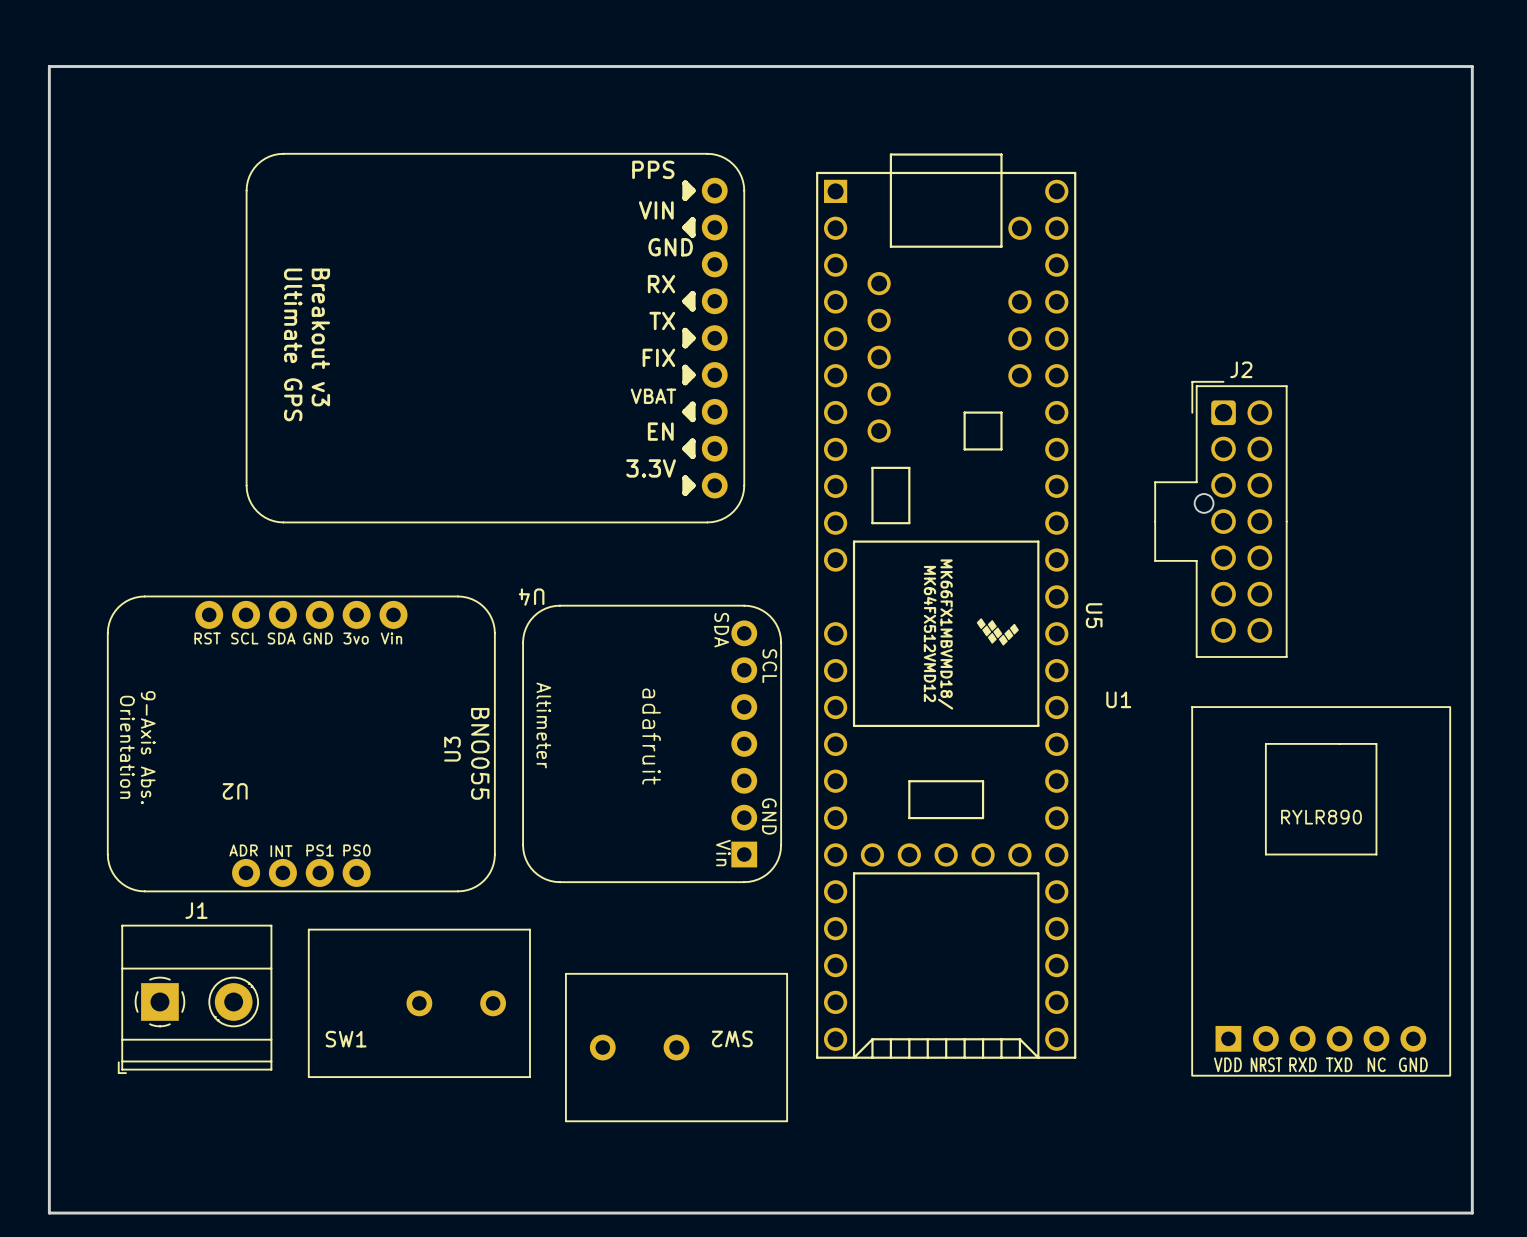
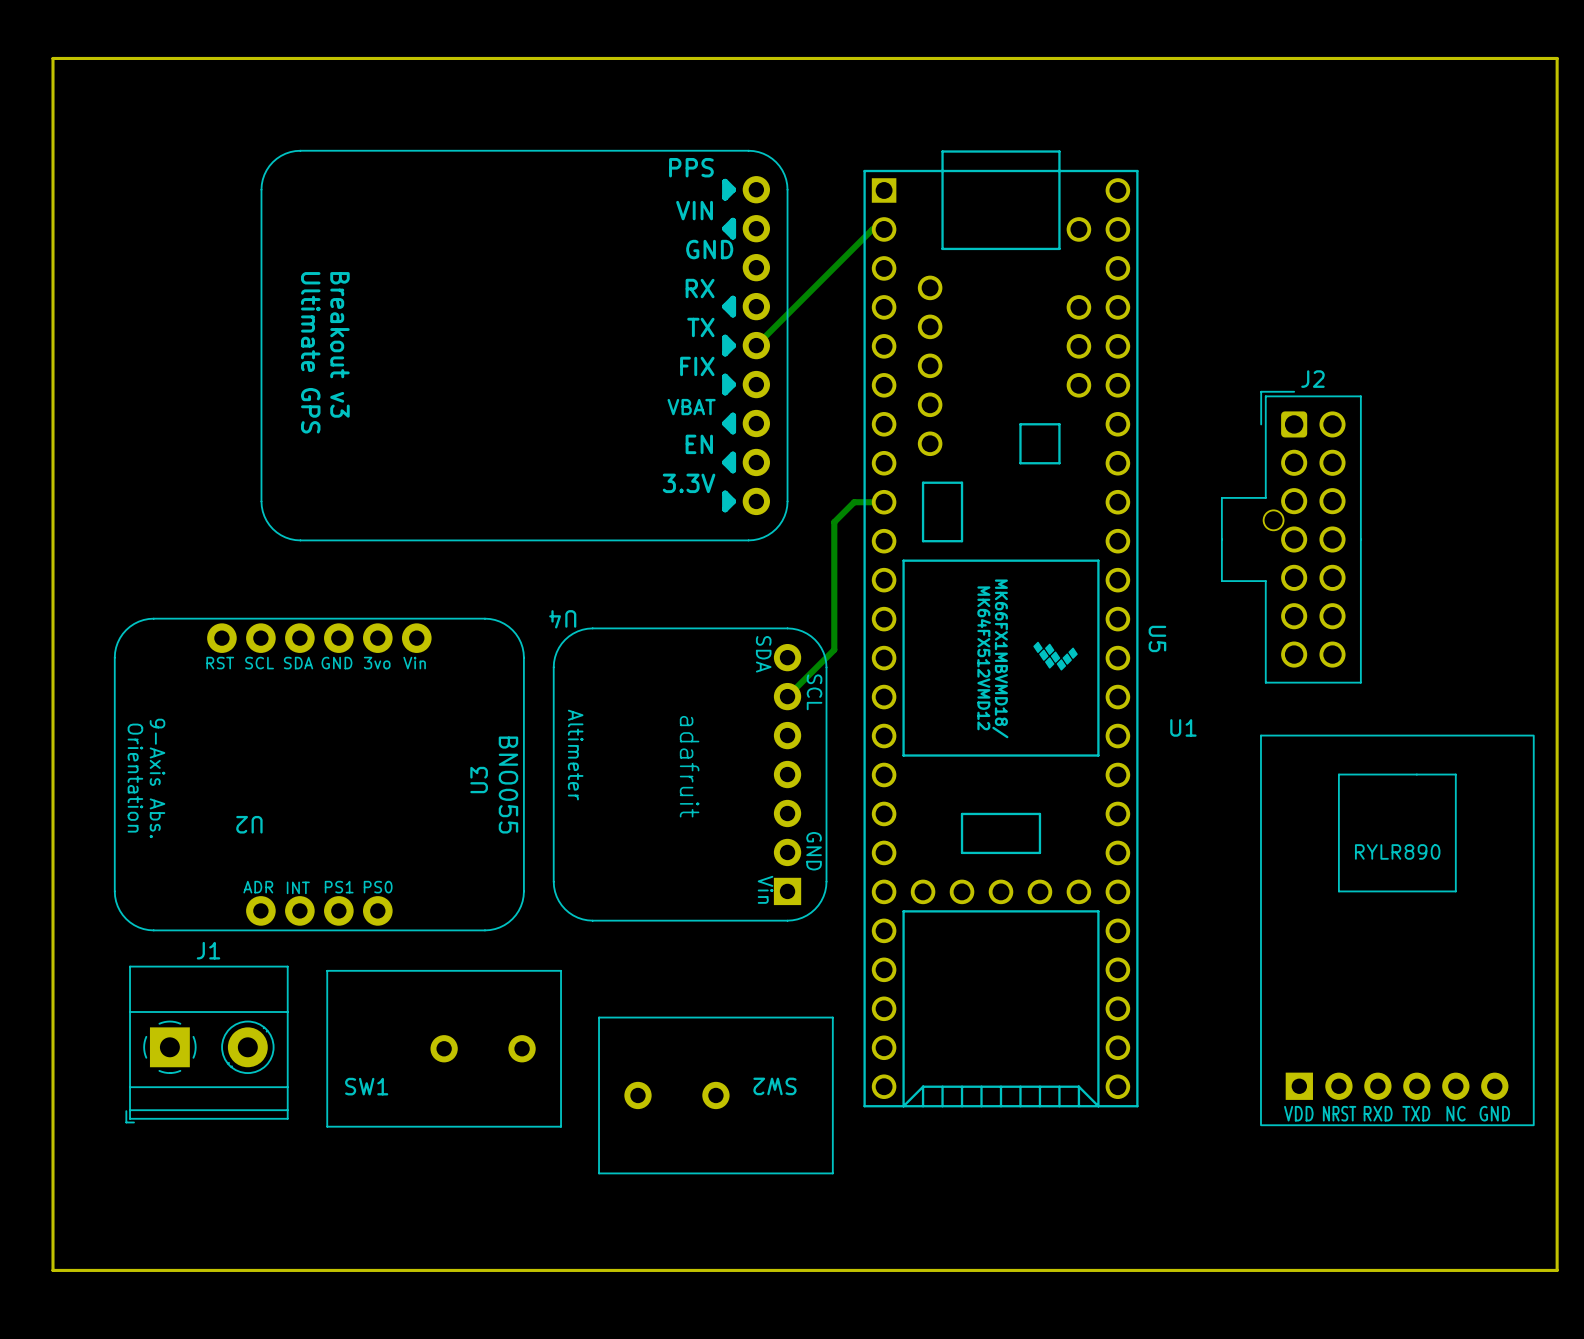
U5 footprint: [816, 153, 1077, 1059] -> [863, 150, 1139, 1108]
track: none -> (884, 229) (872, 229) (756, 345)
track: none -> (884, 502) (854, 502) (834, 522) (834, 649) (787, 696)

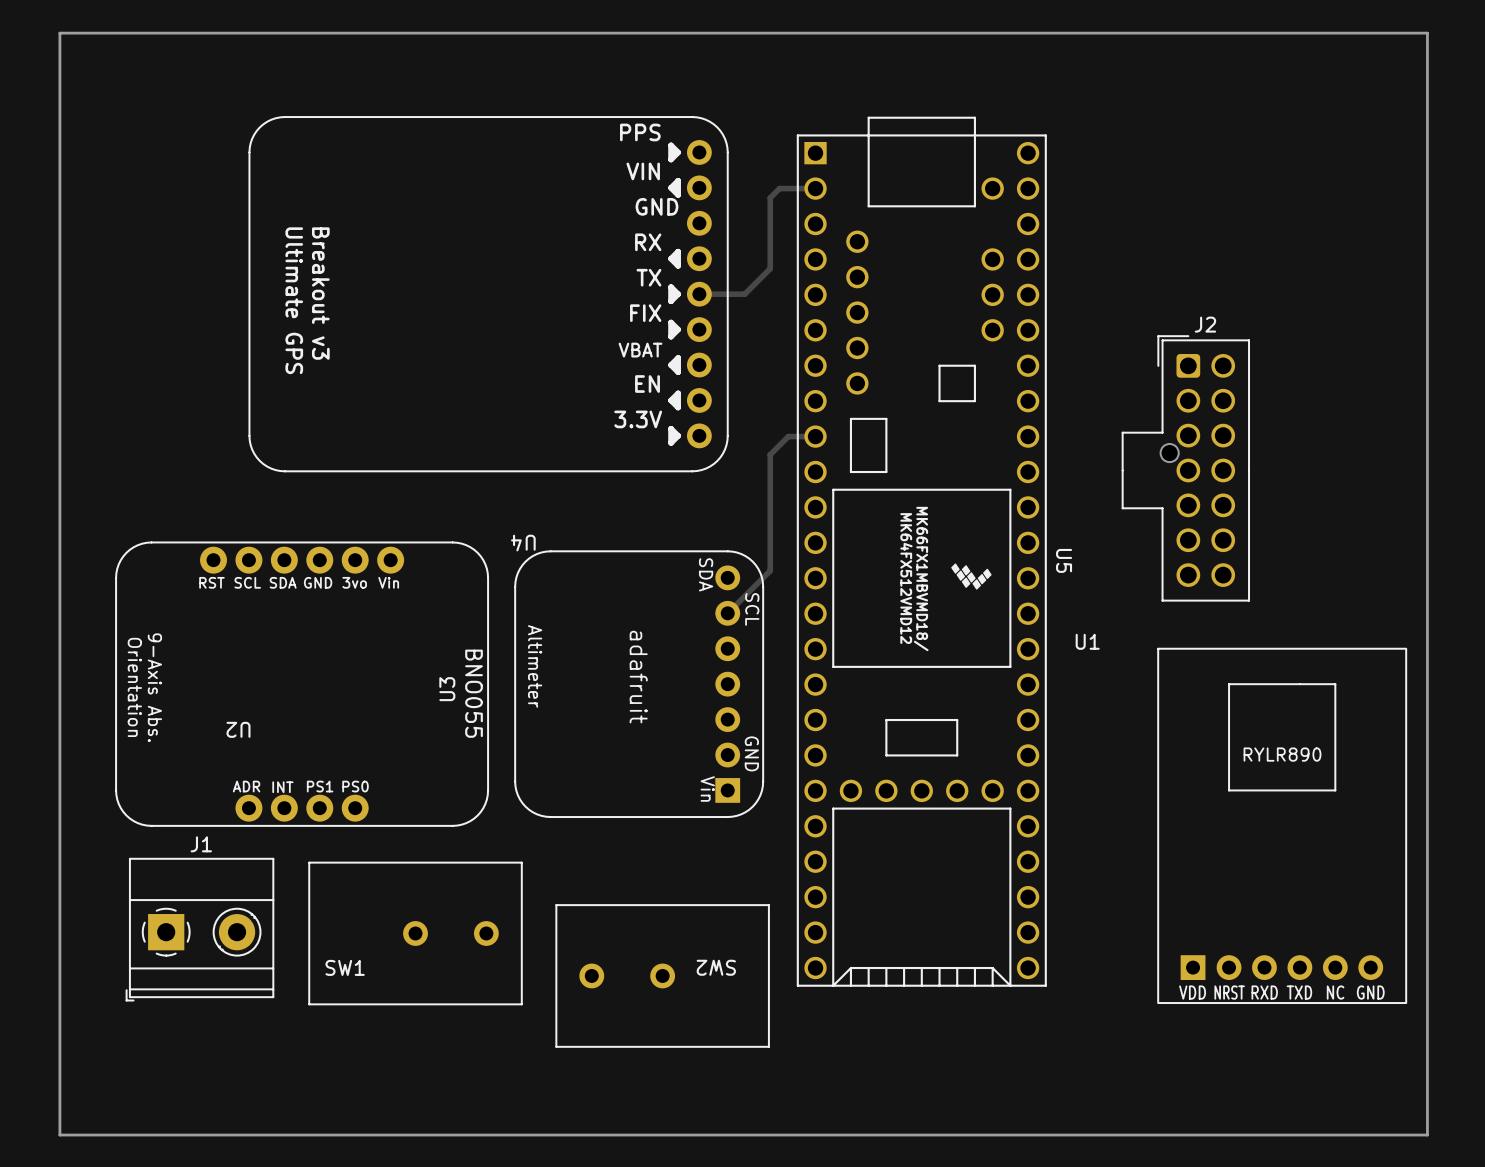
track: (872, 229) (756, 345) -> (804, 188) (779, 188) (770, 197) (770, 268) (744, 294) (699, 294)

